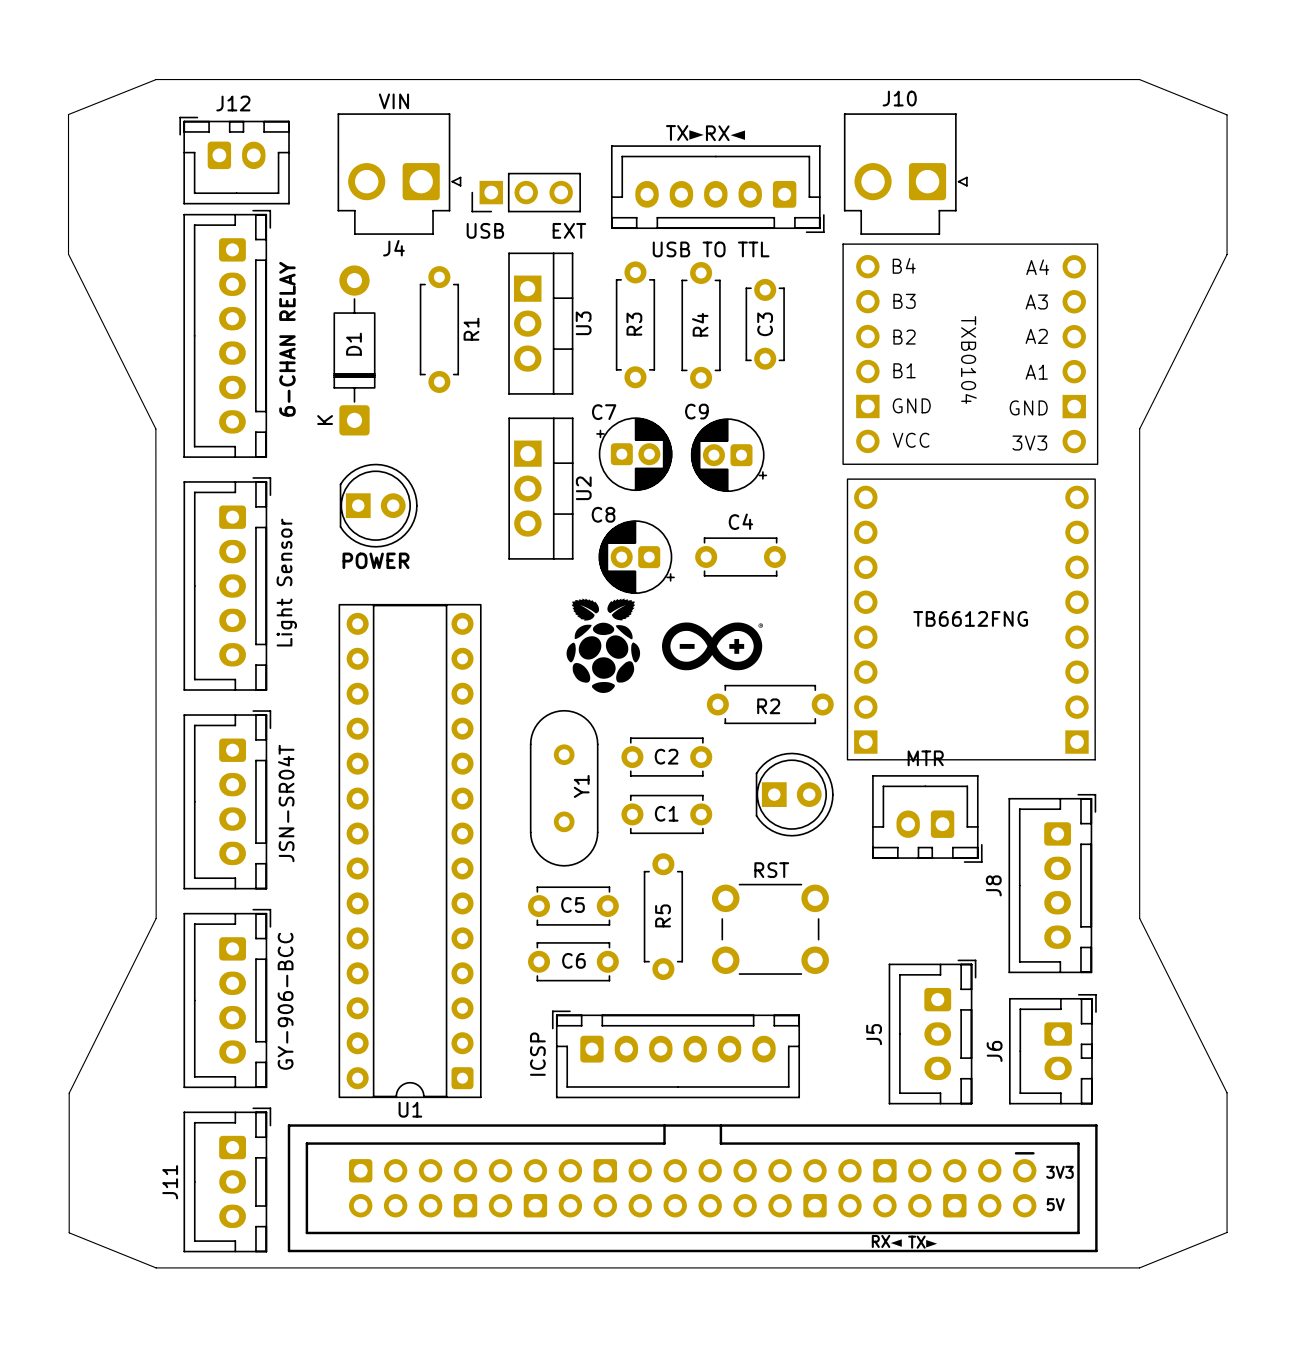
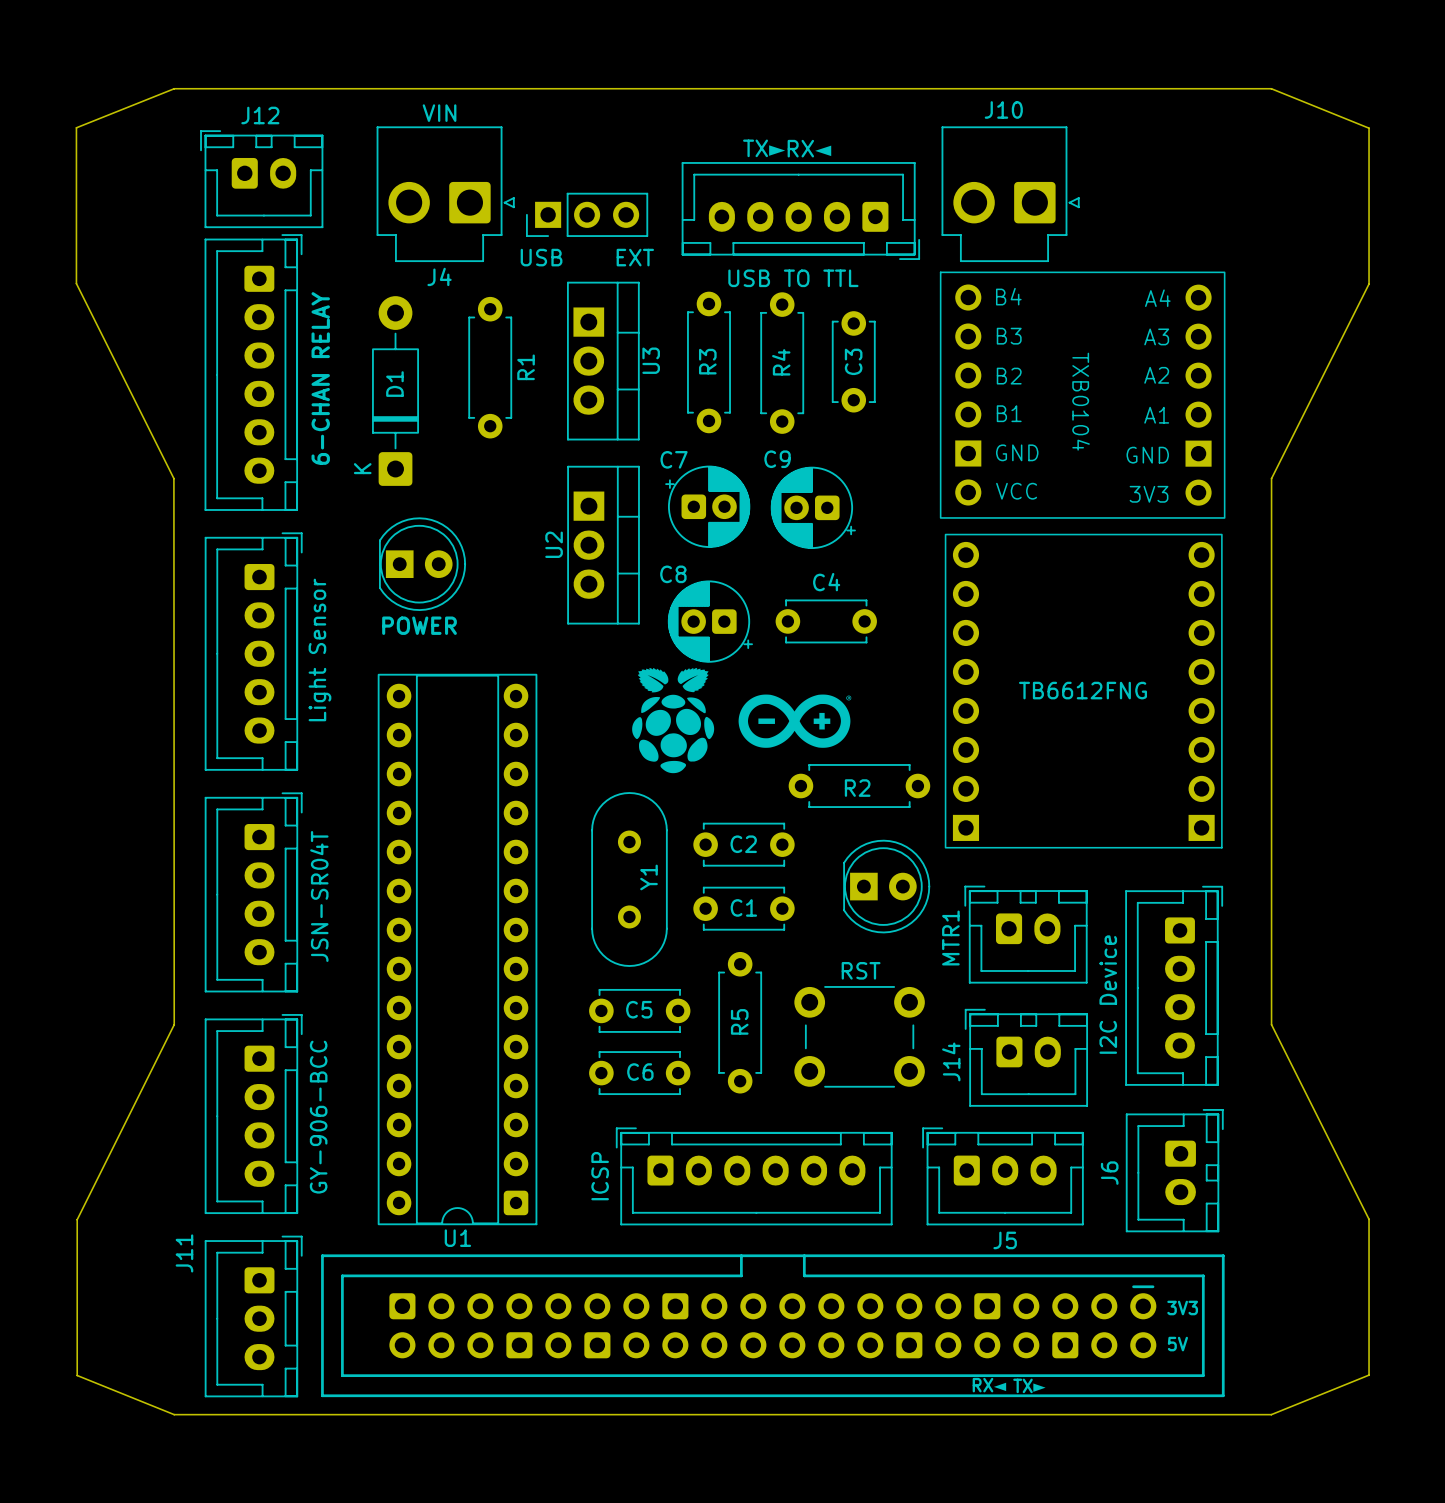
U2 name position: U2 (583, 488) -> U2 (554, 544)
MTR: (927, 818) -> none
MTR1: none -> (1026, 934)
part value: J8 (993, 885) -> I2C Device (1108, 994)
J14: none -> (1026, 1057)
J5 rotation: 0° (932, 1032) -> 90° counterclockwise (1002, 1176)
J11 name position: J11 (170, 1182) -> J11 (184, 1253)

